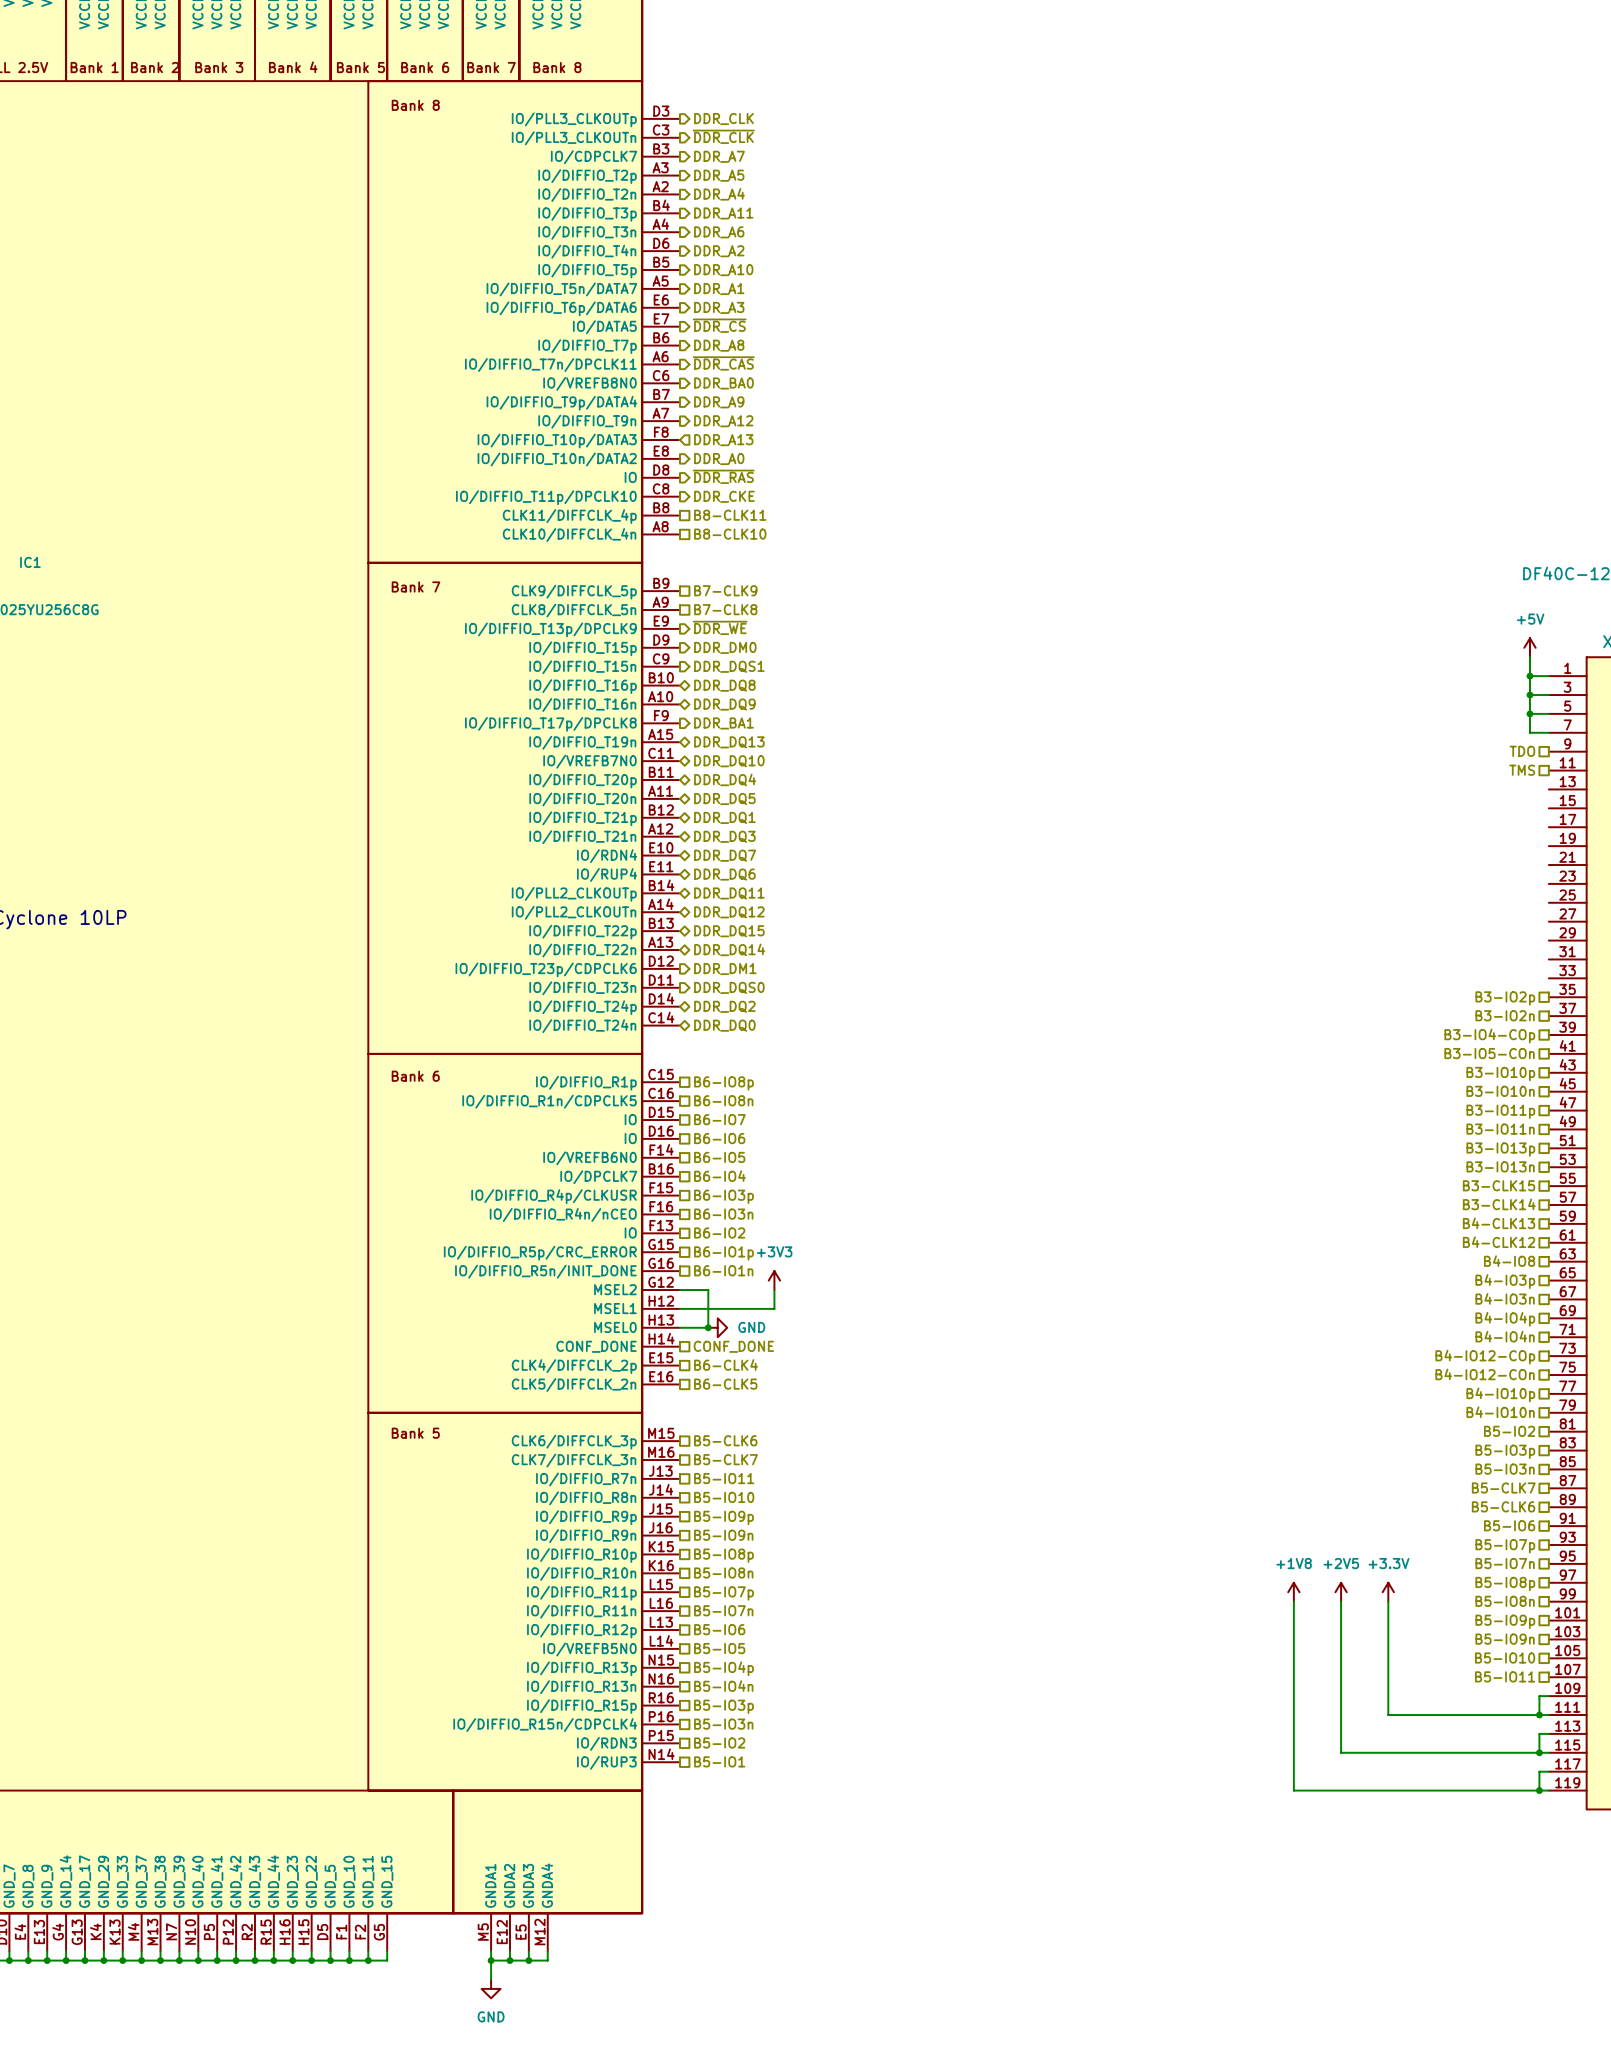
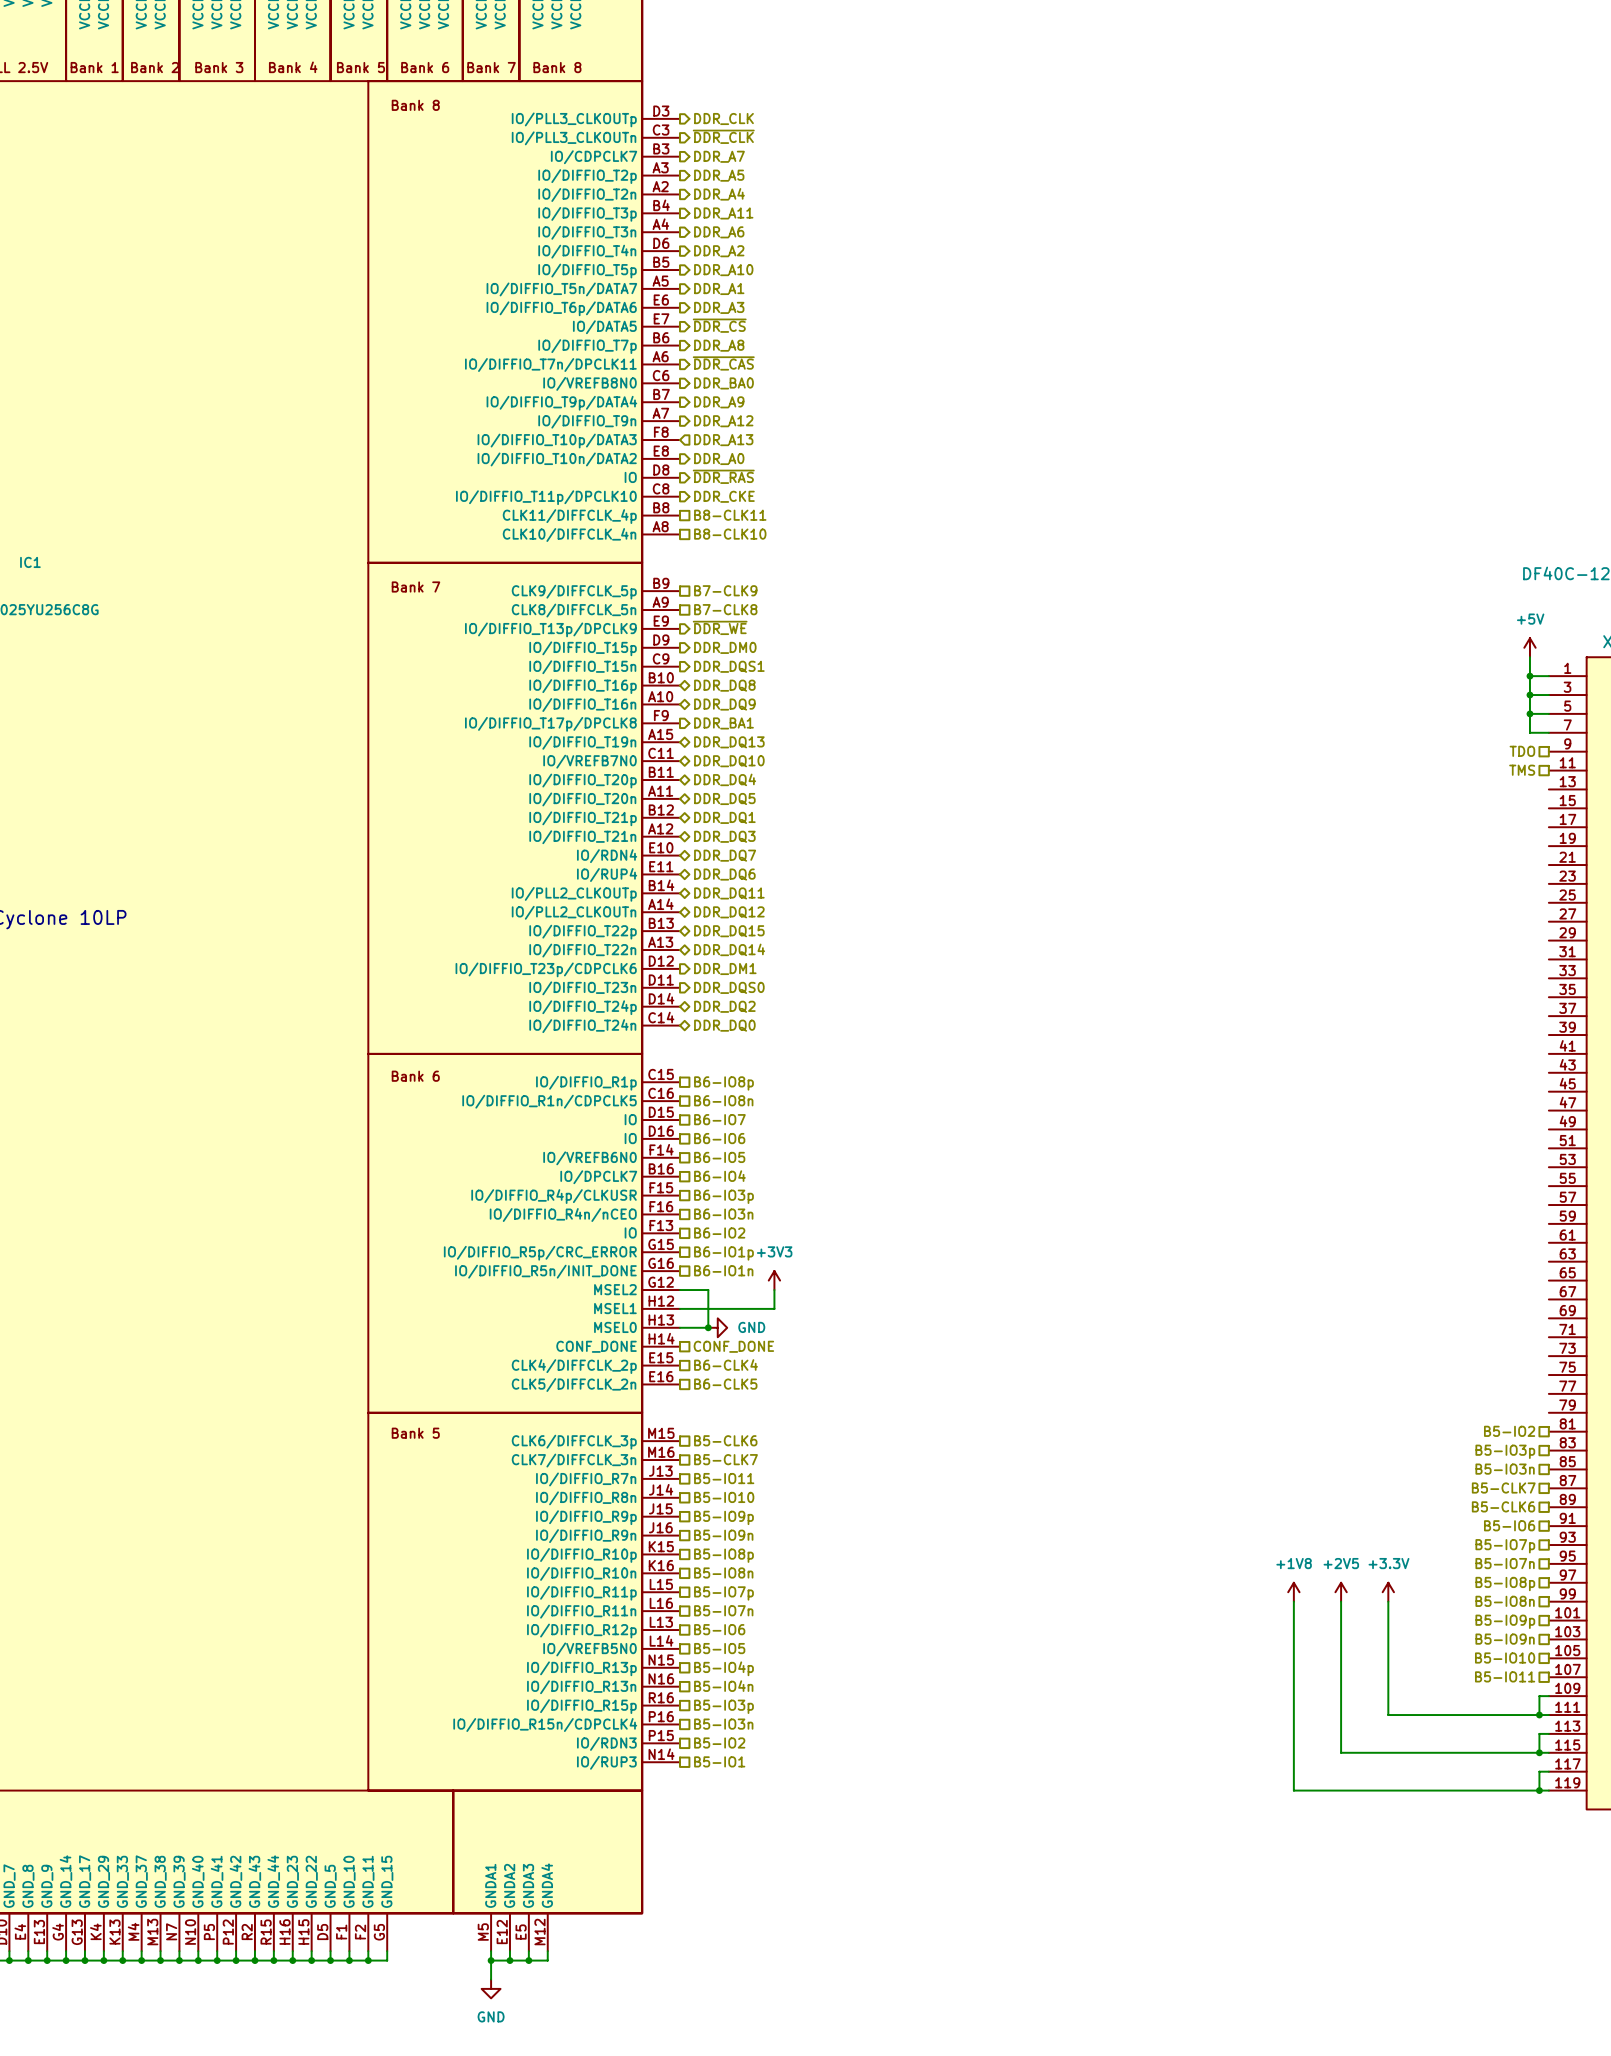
hierarchical label: B3-IO2p (1505, 998) -> none
hierarchical label: B3-IO2n (1505, 1015) -> none
hierarchical label: B3-IO4-COp (1489, 1036) -> none
hierarchical label: B3-IO5-COn (1489, 1053) -> none
hierarchical label: B3-IO10p (1500, 1074) -> none
hierarchical label: B3-IO10n (1500, 1091) -> none
hierarchical label: B3-IO11p (1500, 1111) -> none
hierarchical label: B3-IO11n (1500, 1129) -> none
hierarchical label: B3-IO13p (1500, 1149) -> none
hierarchical label: B3-IO13n (1500, 1166) -> none
hierarchical label: B3-CLK15 (1499, 1185) -> none
hierarchical label: B3-CLK14 (1499, 1204) -> none
hierarchical label: B4-CLK13 (1499, 1223) -> none
hierarchical label: B4-CLK12 (1499, 1242) -> none
hierarchical label: B4-IO8 (1509, 1261) -> none
hierarchical label: B4-IO3p (1505, 1281) -> none
hierarchical label: B4-IO3n (1505, 1298) -> none
hierarchical label: B4-IO4p (1505, 1319) -> none
hierarchical label: B4-IO4n (1505, 1336) -> none
hierarchical label: B4-IO12-COp (1485, 1357) -> none
hierarchical label: B4-IO12-COn (1485, 1374) -> none
hierarchical label: B4-IO10p (1500, 1394) -> none
hierarchical label: B4-IO10n (1500, 1412) -> none

